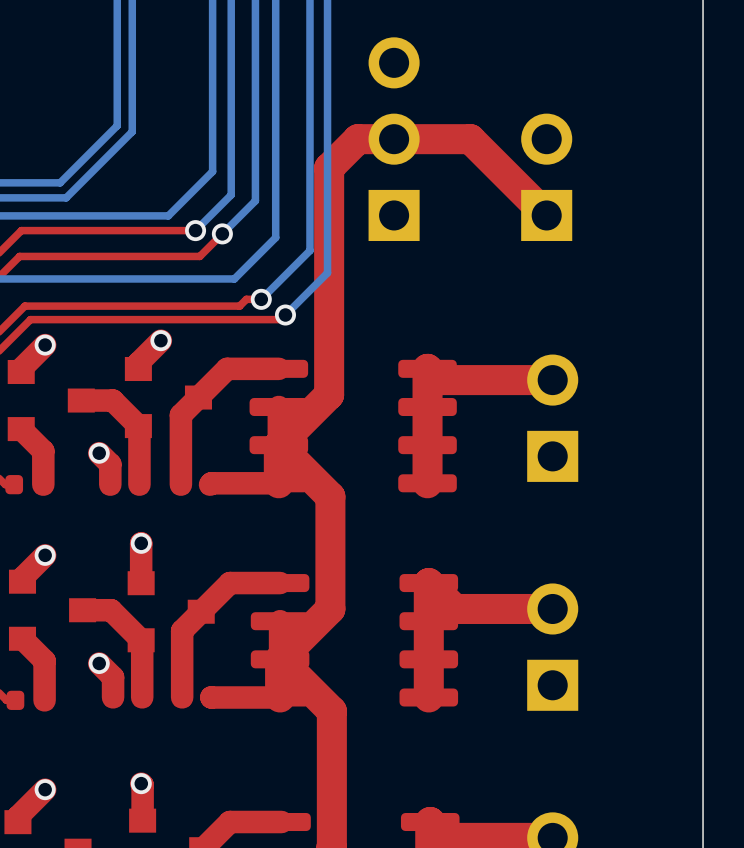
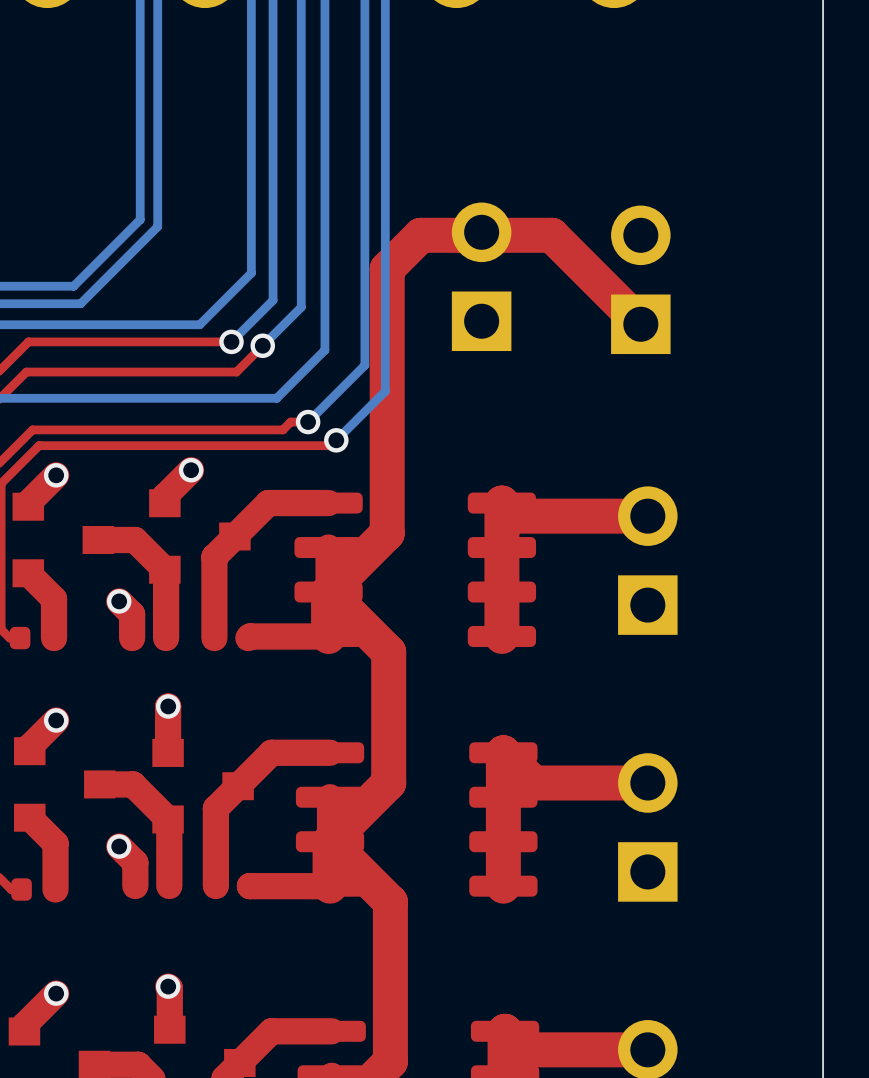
part: (394, 139) -> none
part: none -> (481, 276)

